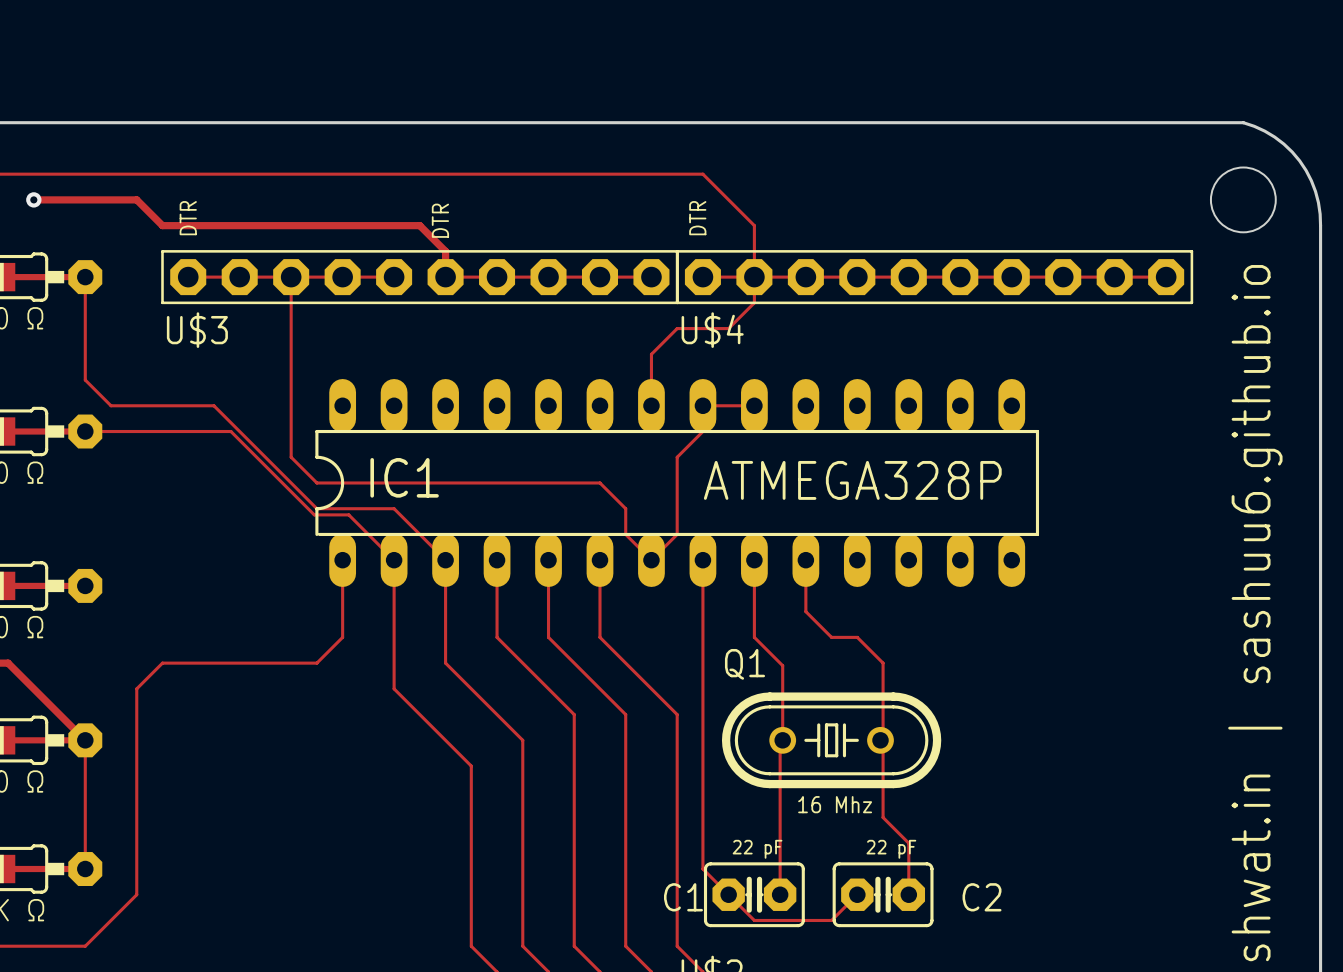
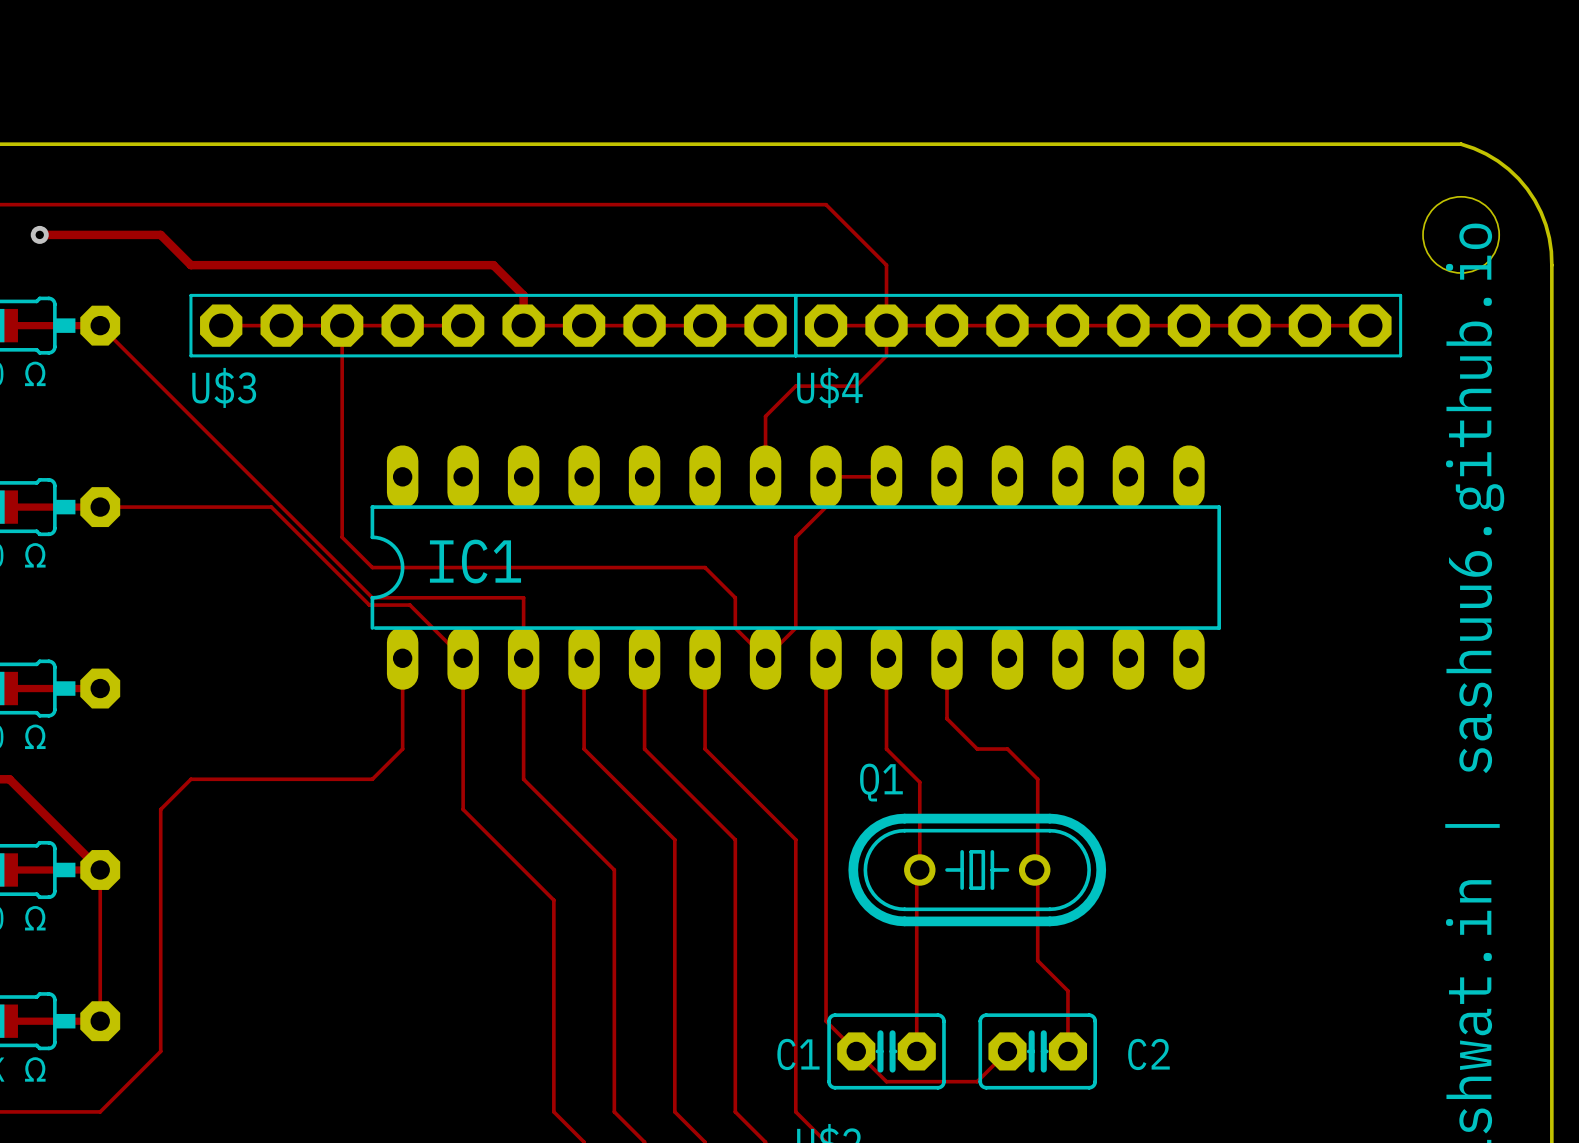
text: DTR (188, 218) -> none
text: DTR (697, 218) -> none
text: DTR (440, 220) -> none
track: (85, 277) (85, 380) (111, 405) (213, 405) -> (100, 325) (251, 476)
text: ATMEGA328P (852, 480) -> none
track: (394, 508) (445, 560) -> (463, 597) (523, 597) (523, 658)
text: 16 Mhz (835, 804) -> none
text: 22 pF (757, 849) -> none
text: 22 pF (891, 849) -> none

